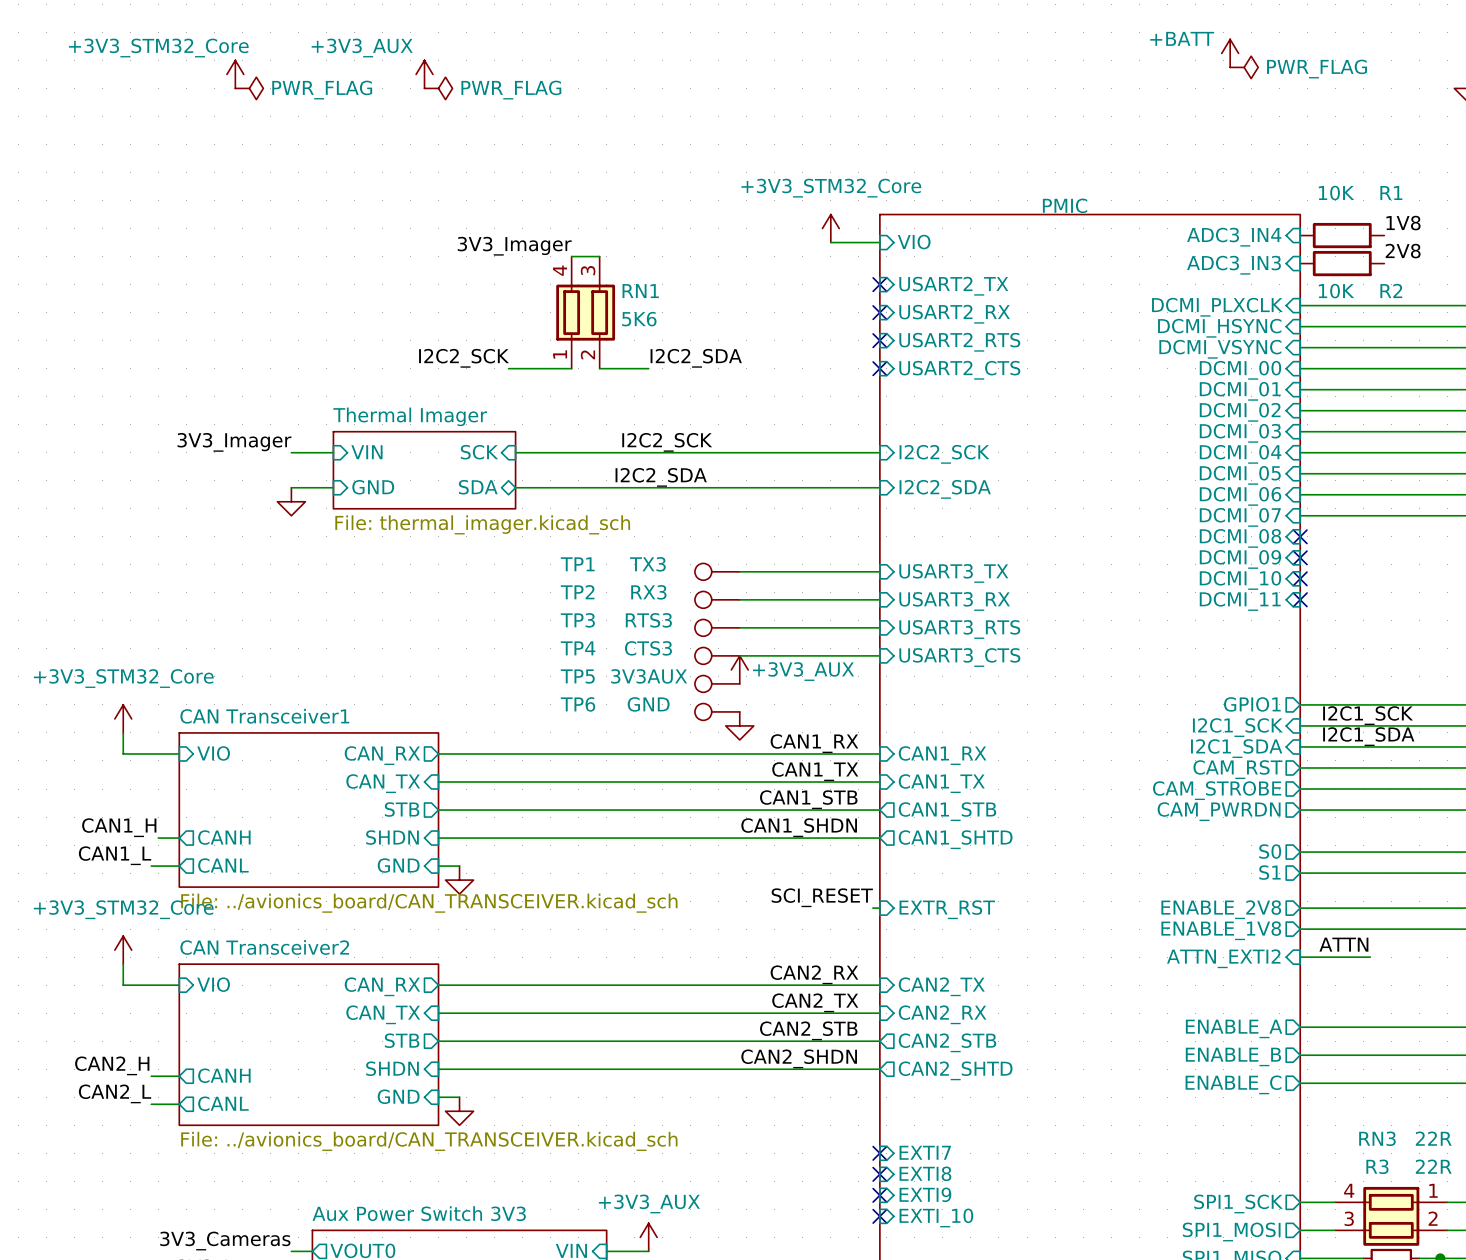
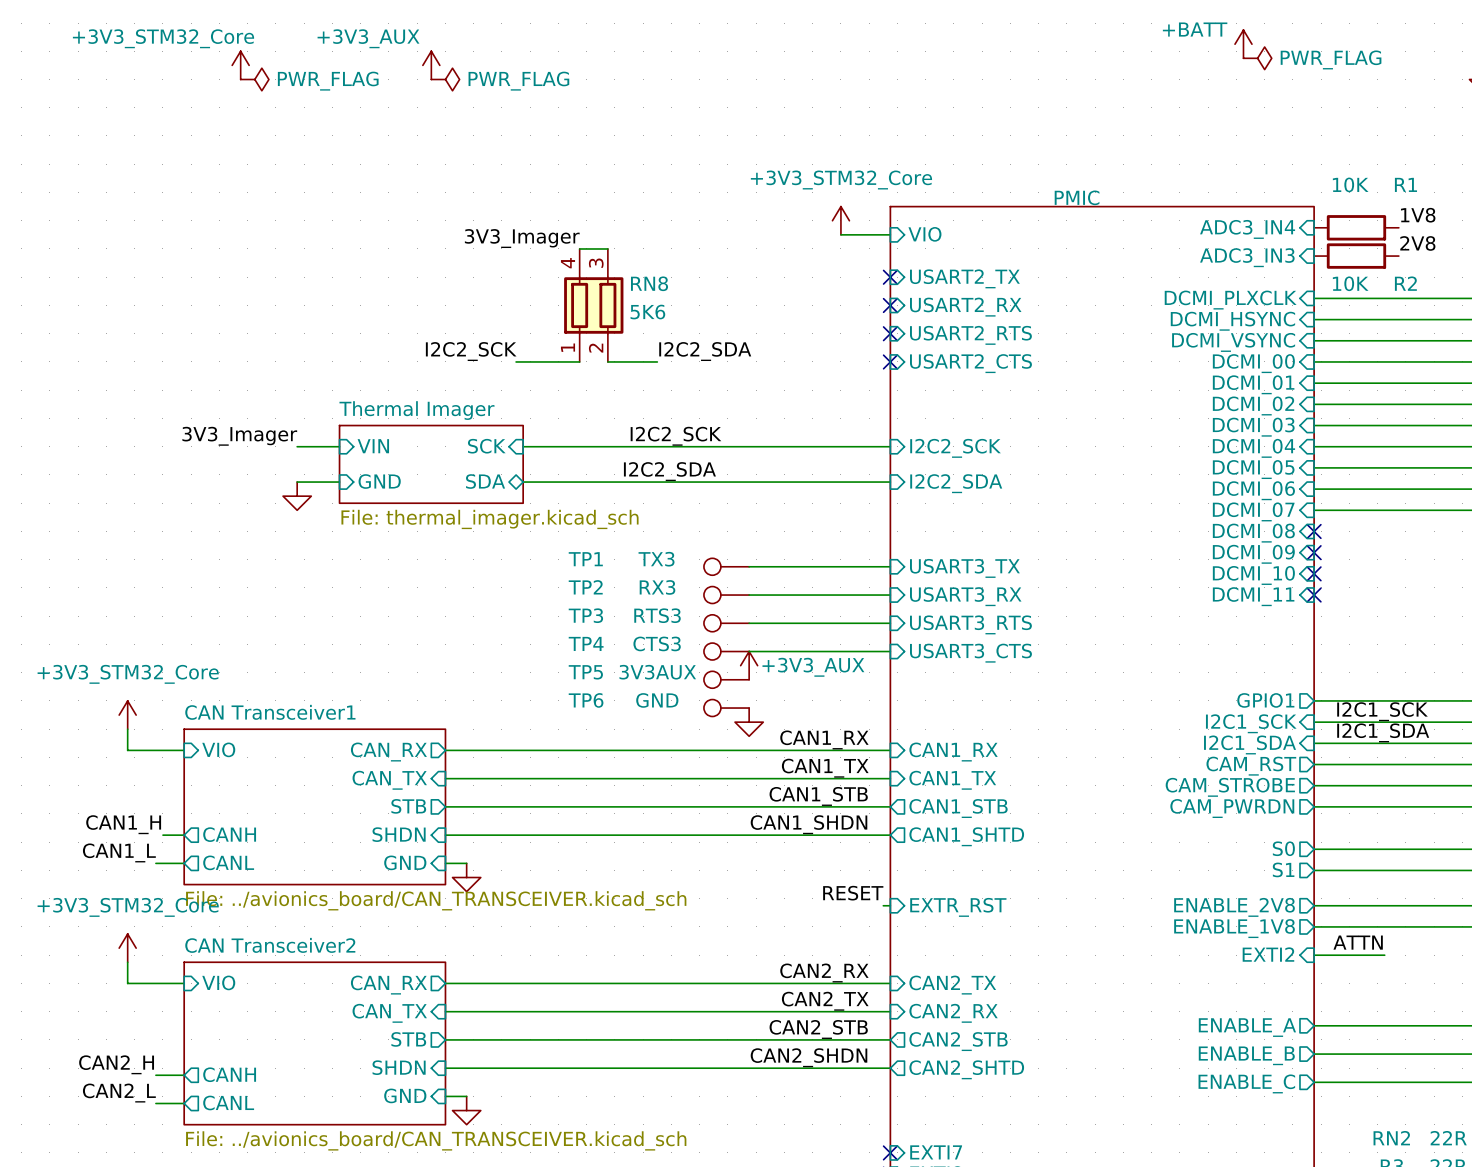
RN1 name: RN1 (640, 291) -> RN8 (649, 283)
label: SCI_RESET (822, 897) -> RESET (853, 893)
sheet pin: ATTN_EXTI2 (1223, 958) -> EXTI2 (1268, 954)
RN3 name: RN3 (1377, 1138) -> RN2 (1391, 1138)

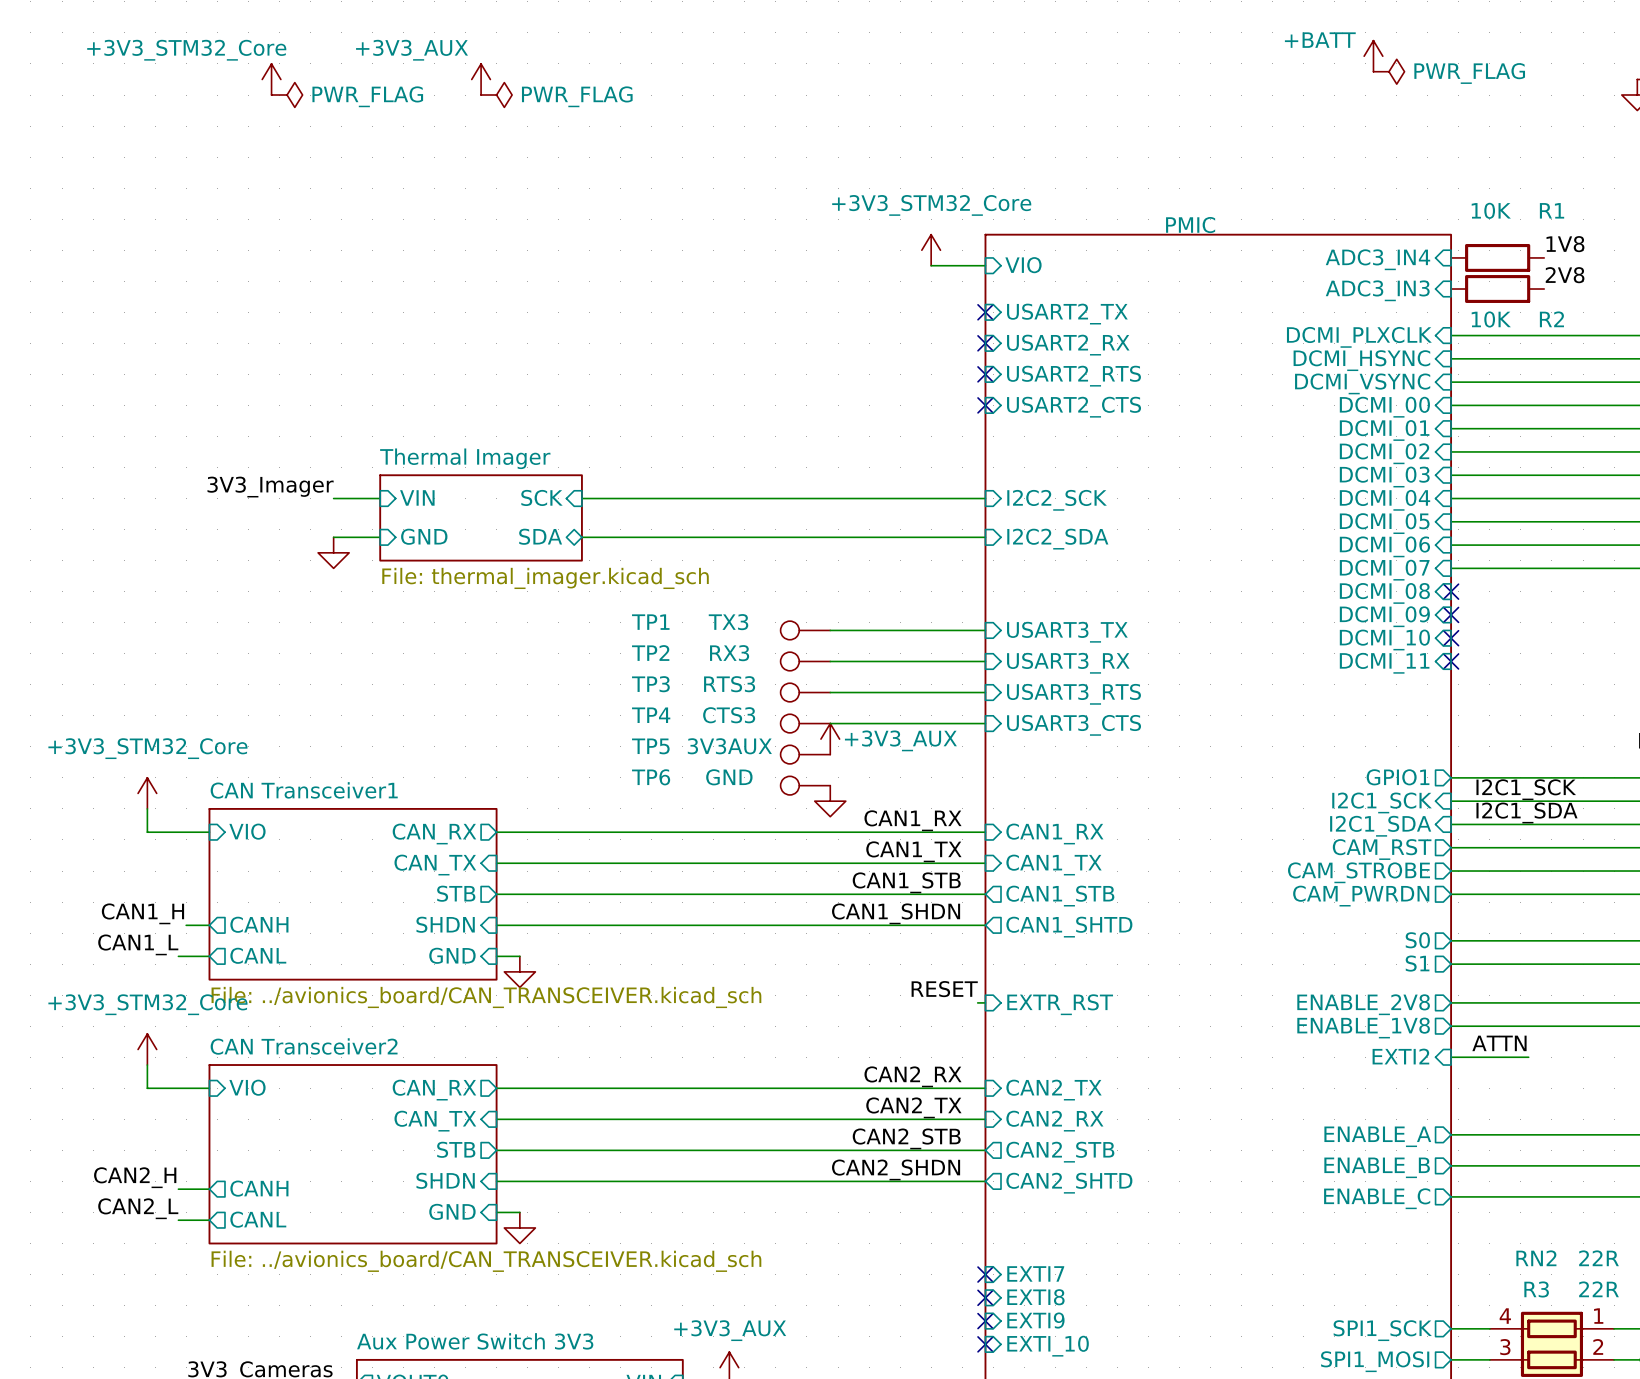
label: 3V3_Imager (522, 238) -> none
wire: (579, 248) (607, 248) -> none
RN8: 5K6 (593, 305) -> none
label: I2C2_SCK (471, 351) -> none
label: I2C2_SDA (705, 351) -> none
wire: (516, 361) (579, 361) -> none
wire: (607, 361) (657, 361) -> none
label: I2C2_SCK (675, 436) -> none
label: I2C2_SDA (669, 471) -> none

